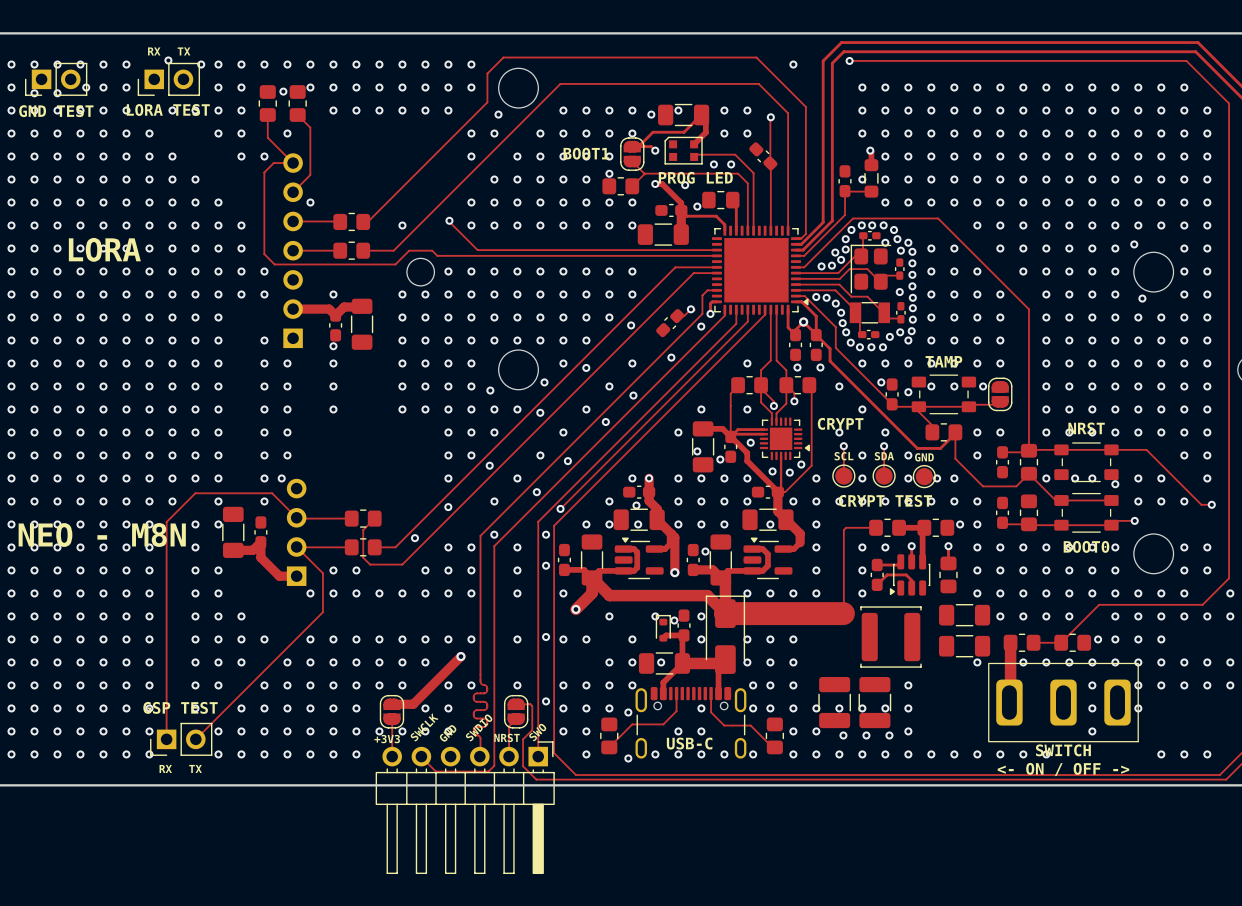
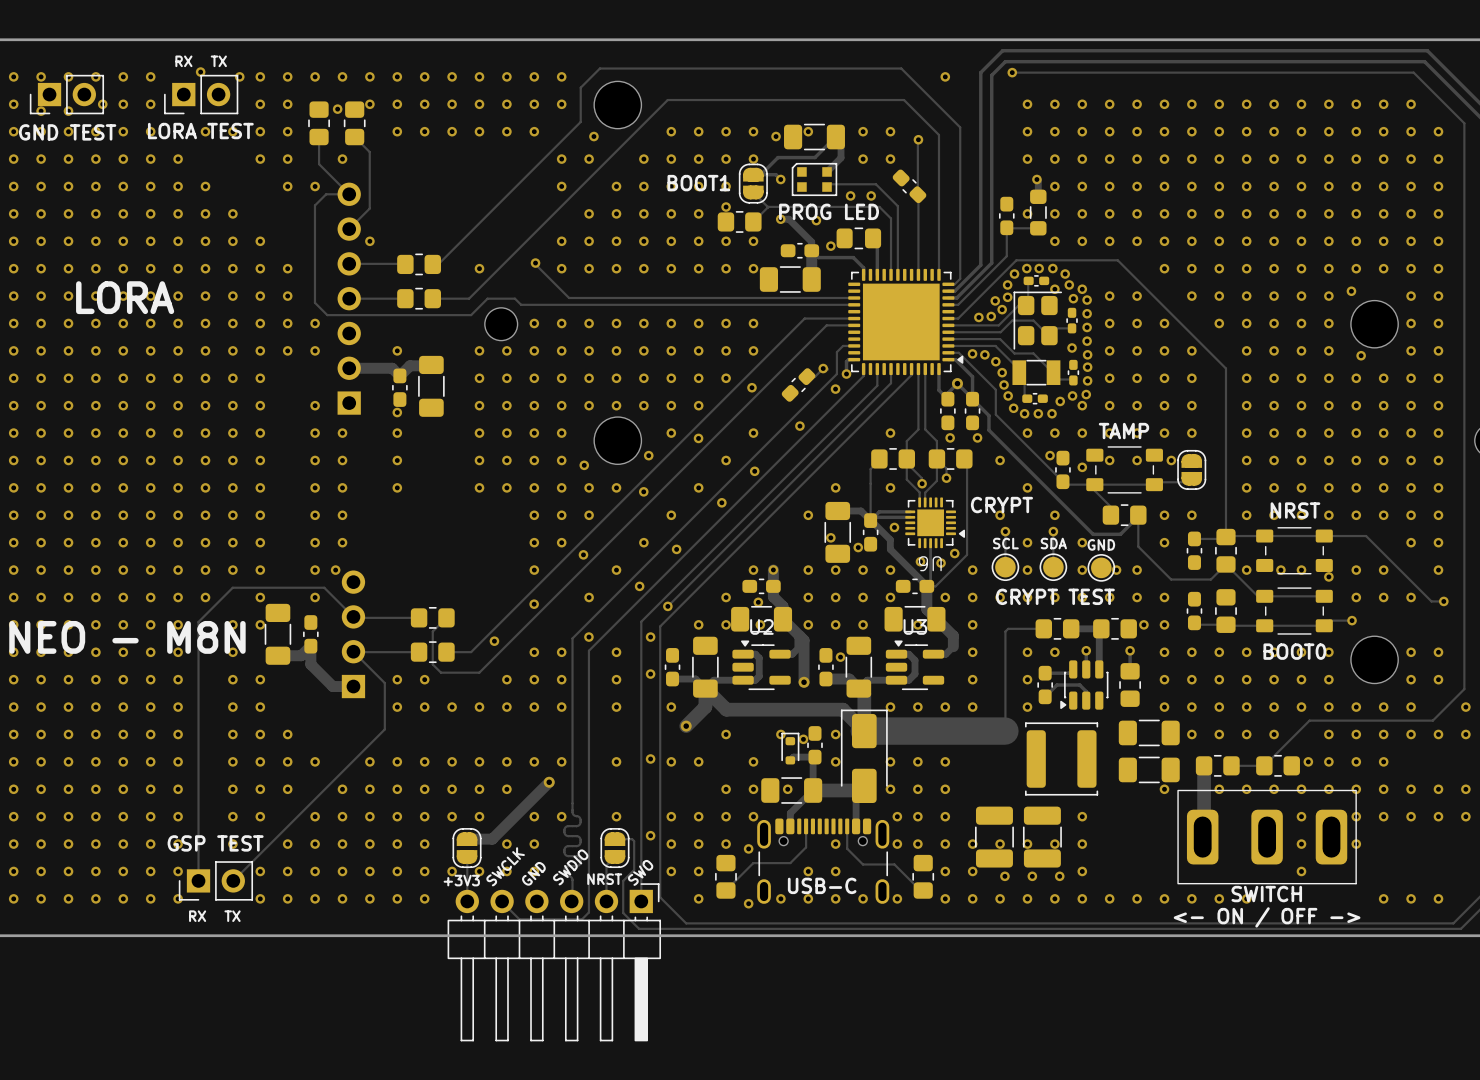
U6 name: none -> U6 (930, 563)
U2 name: none -> U2 (761, 626)
U3 name: none -> U3 (915, 626)
via: (310, 593) -> none

